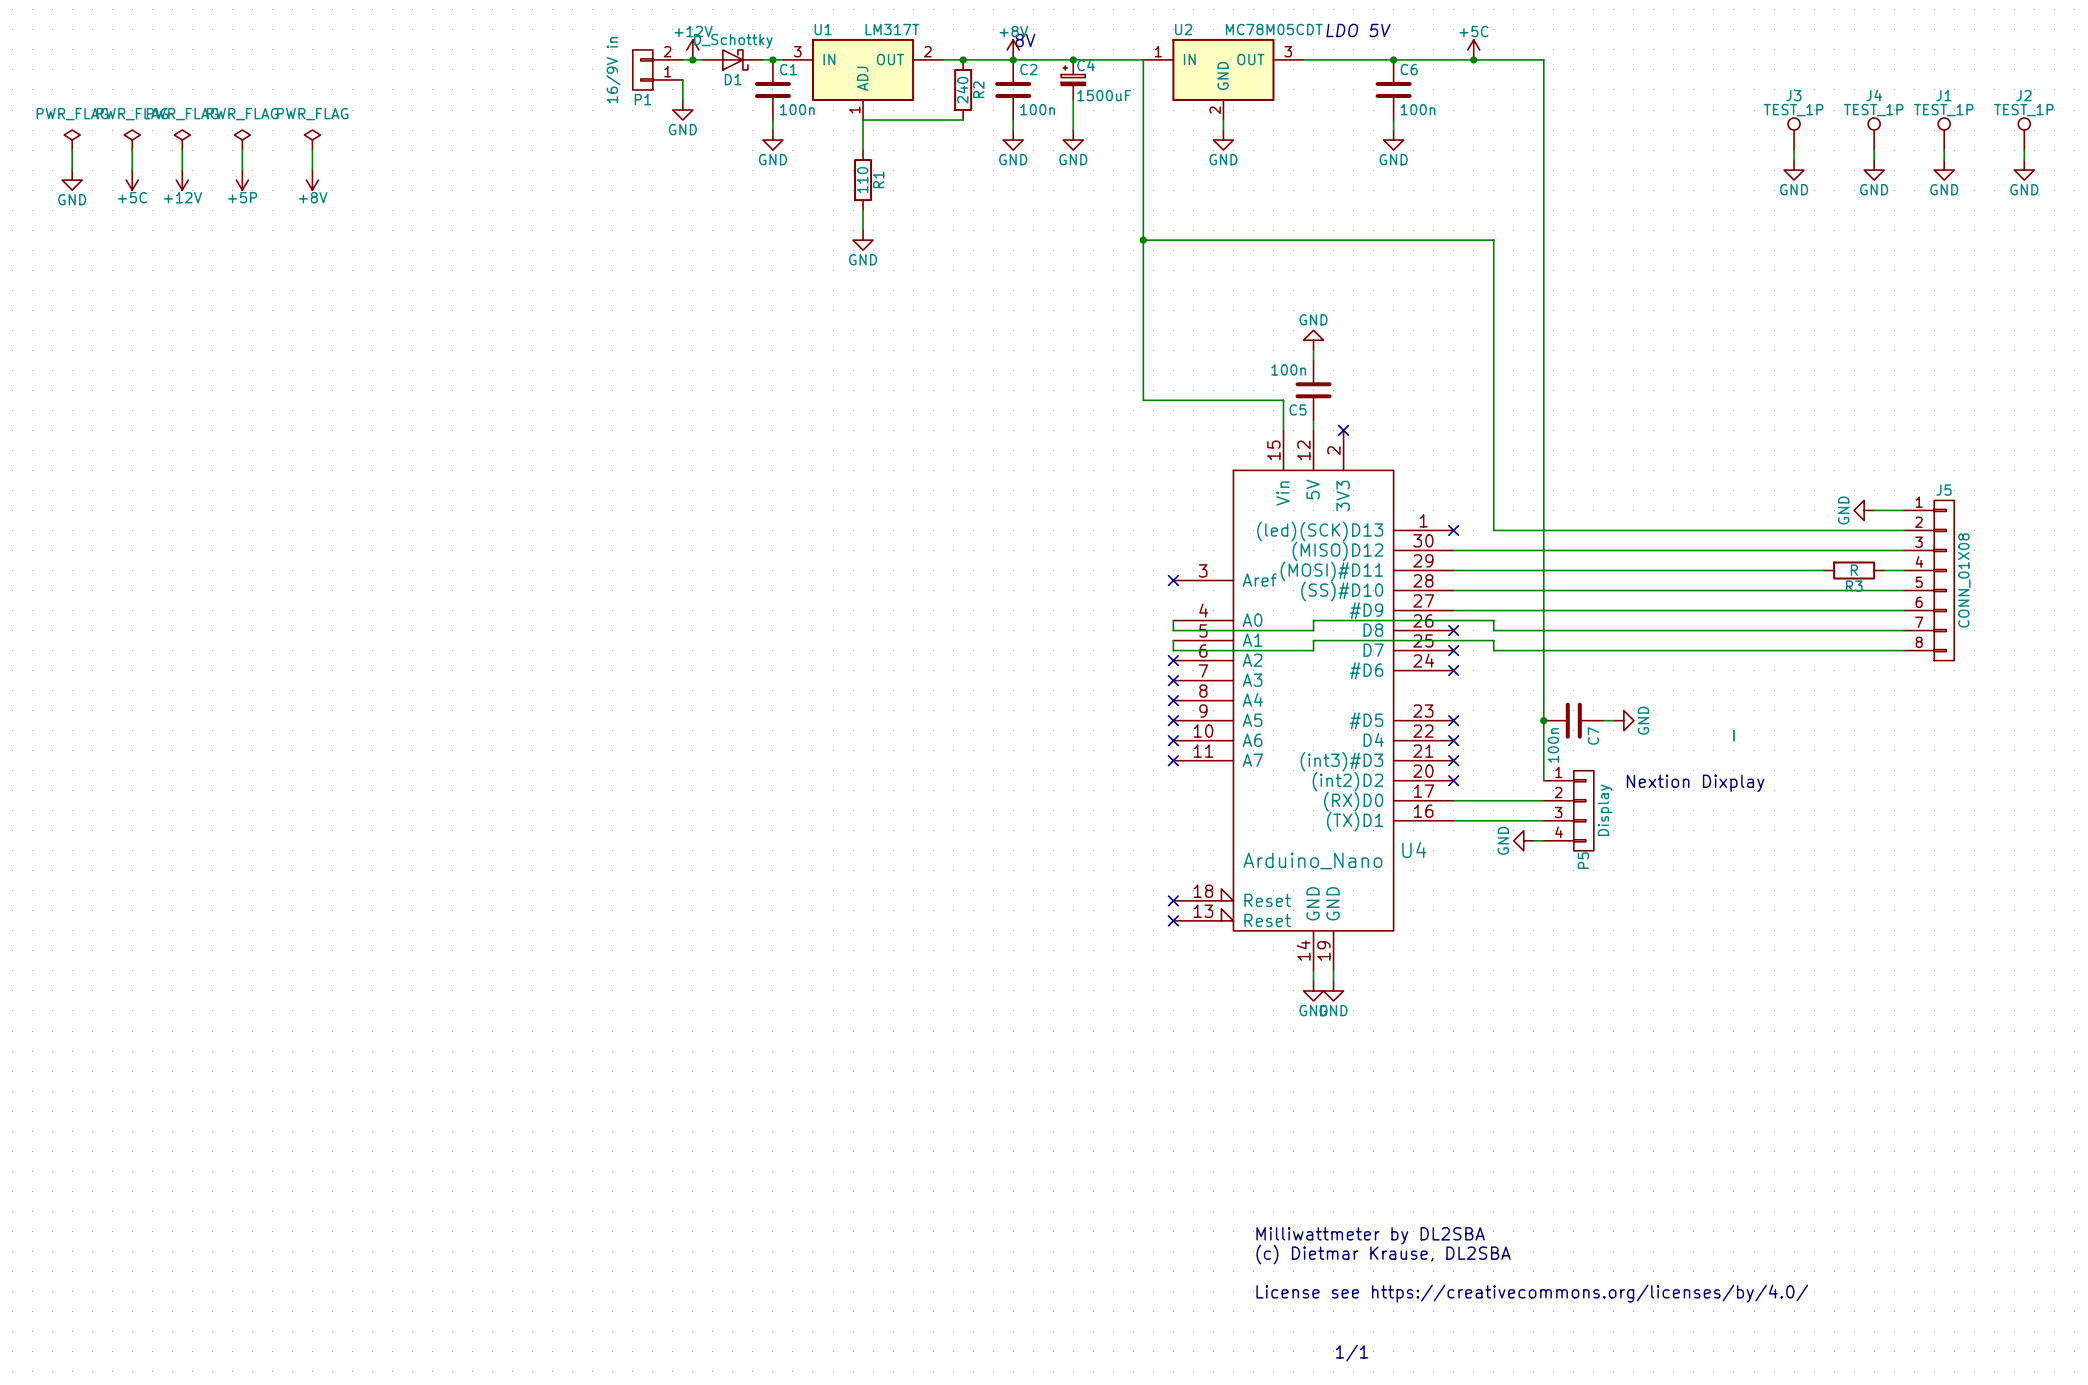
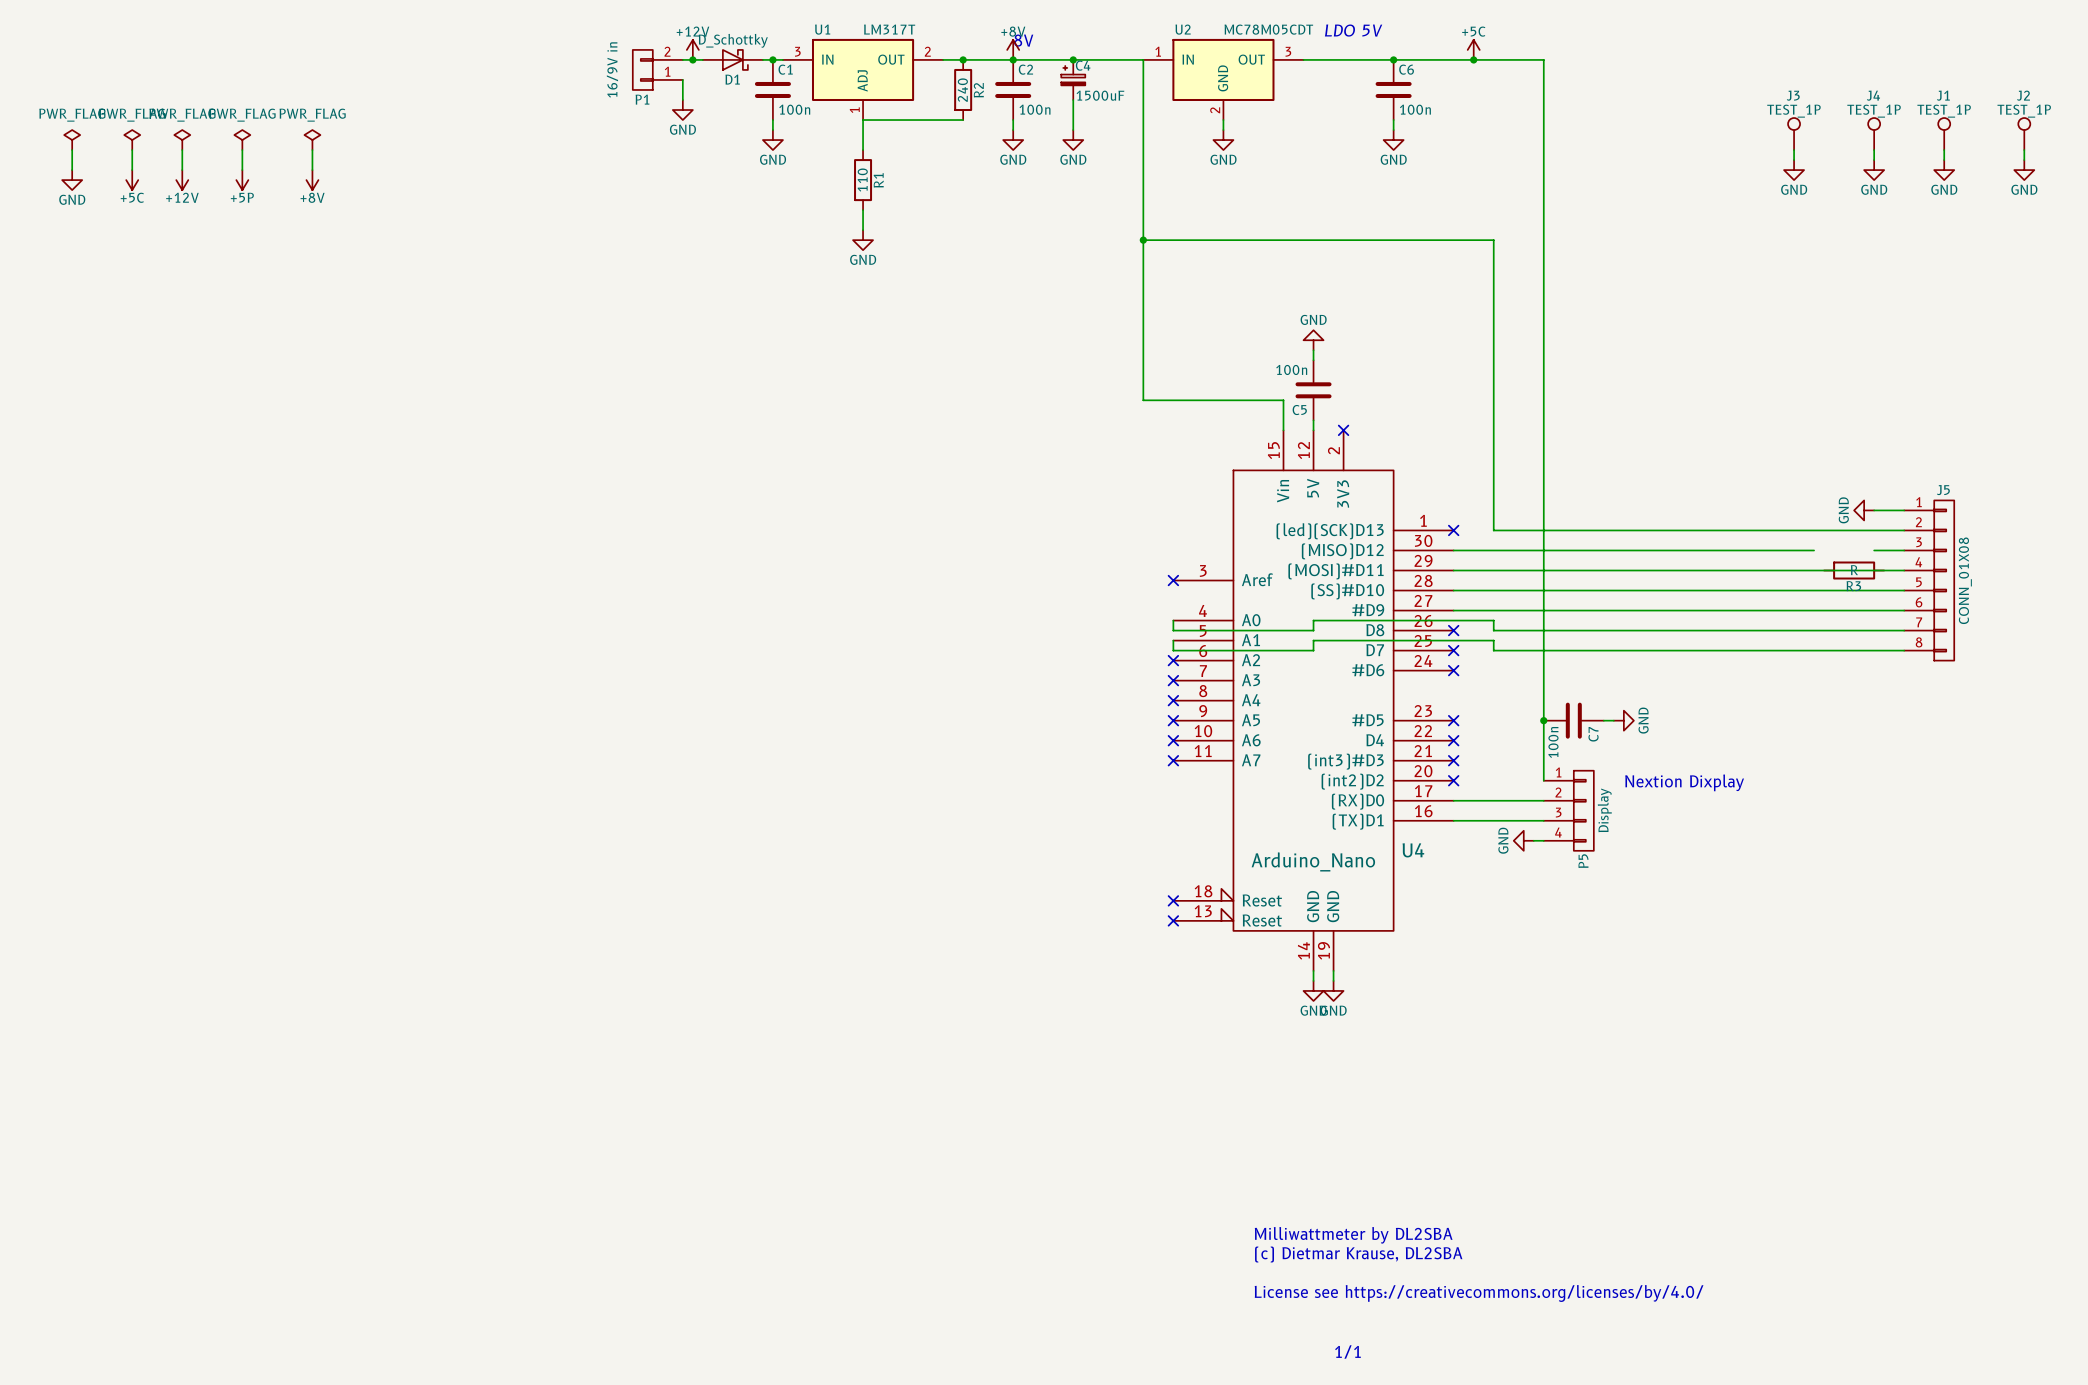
wire: (1814, 550) (1874, 550) -> (1824, 570) (1884, 570)
wire: (1733, 730) (1733, 740) -> none

